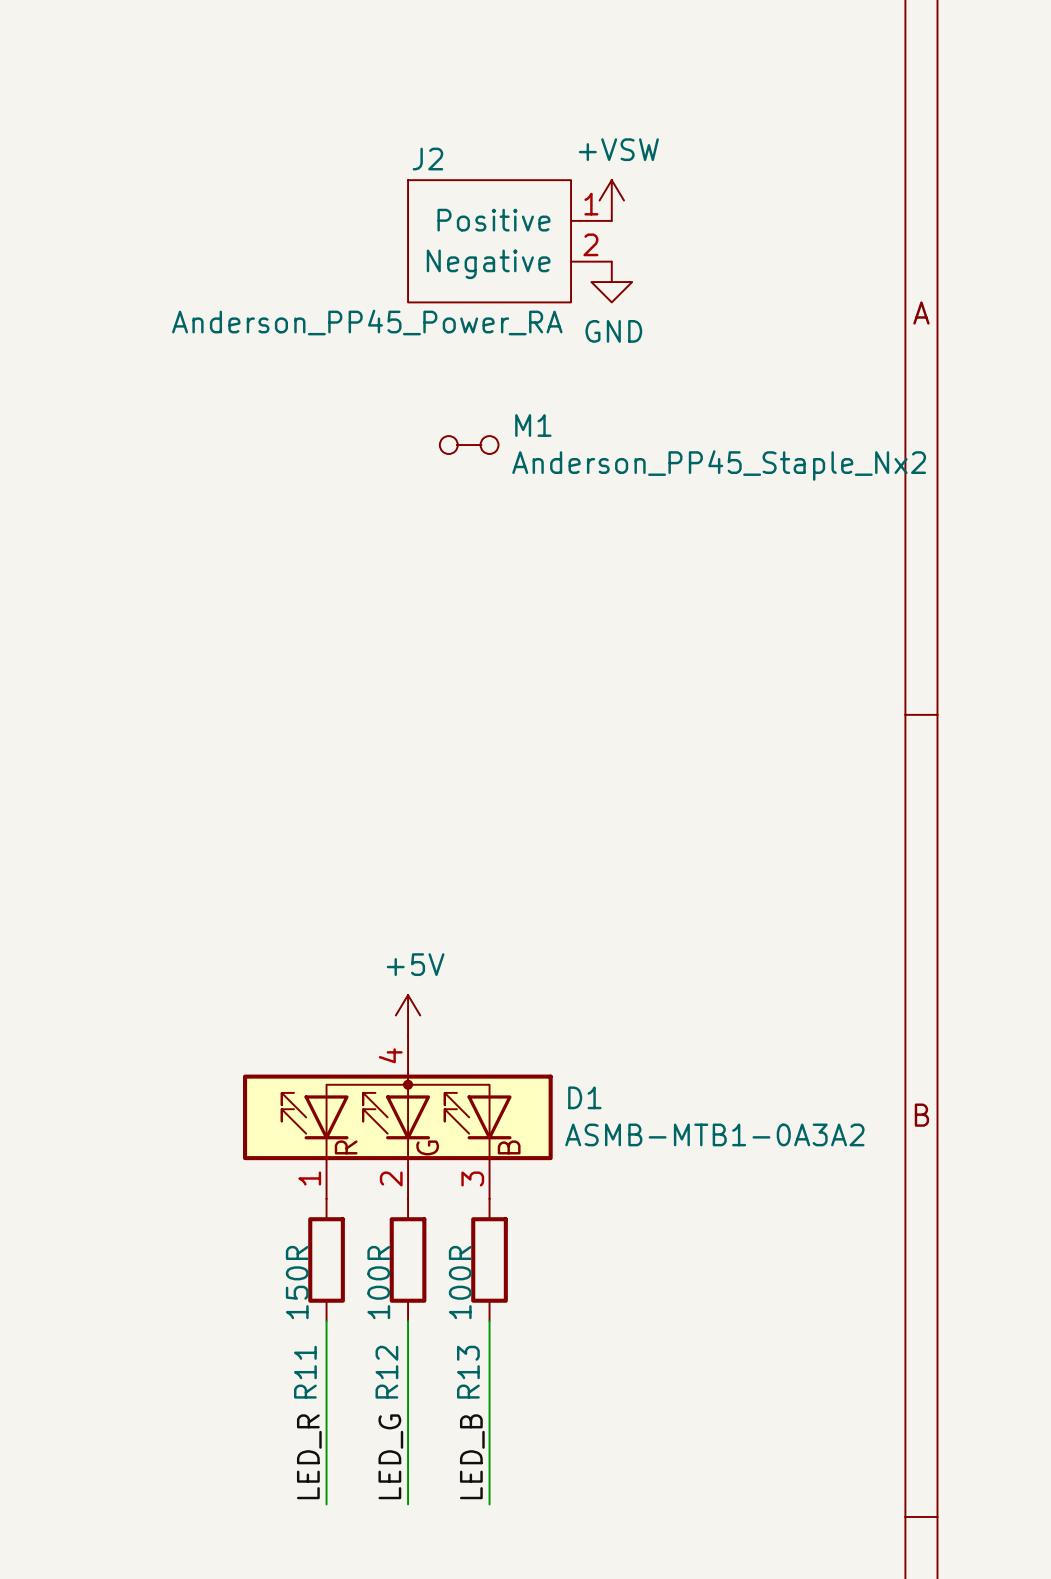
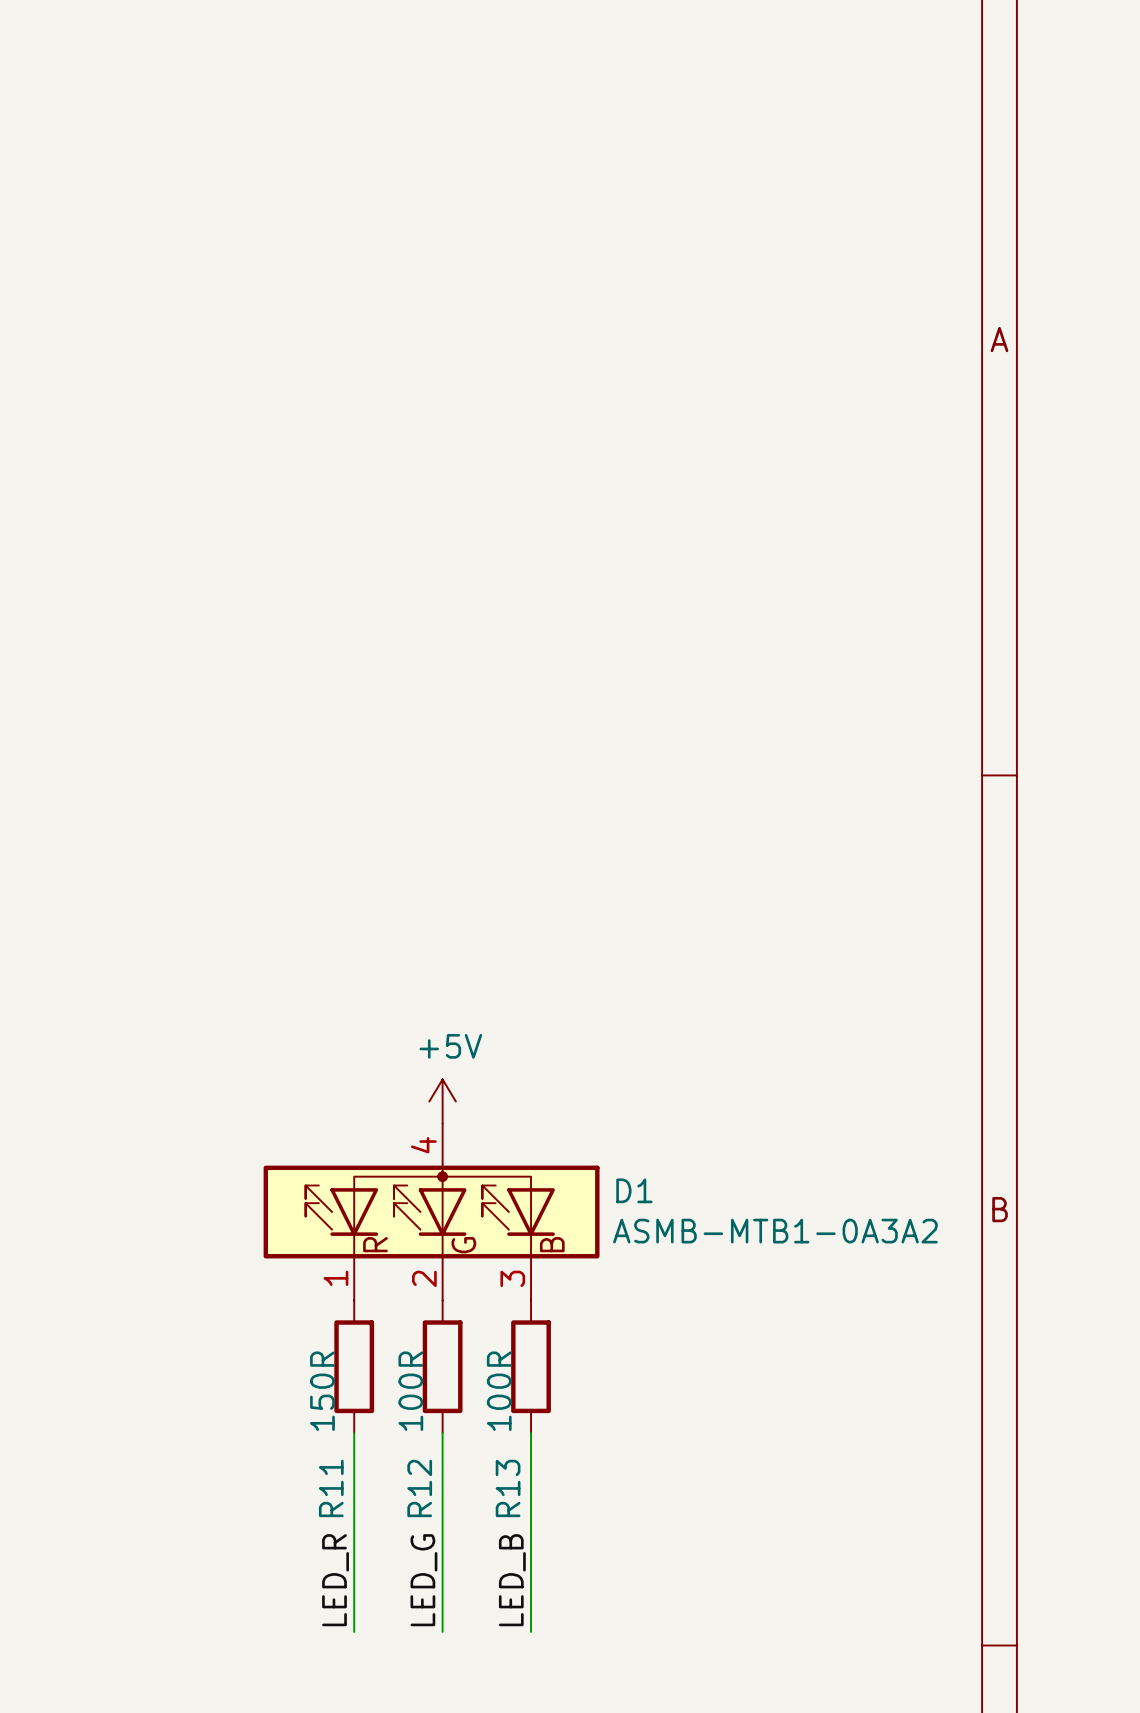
power symbol: +VSW (611, 200) -> none
J2: Anderson_PP45_Power_RA (509, 241) -> none
power symbol: GND (611, 282) -> none
M1: Anderson_PP45_Staple_Nx2 (469, 445) -> none

